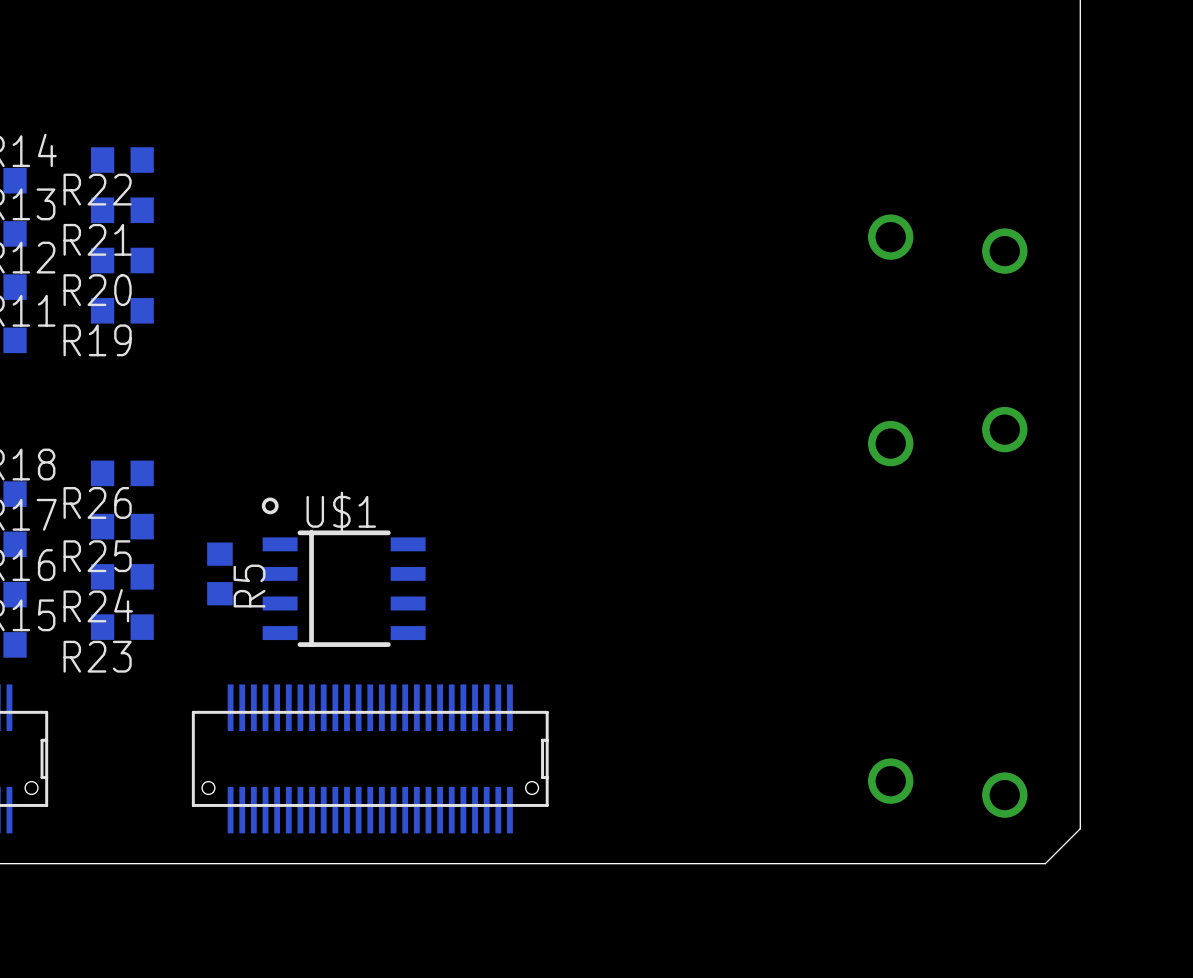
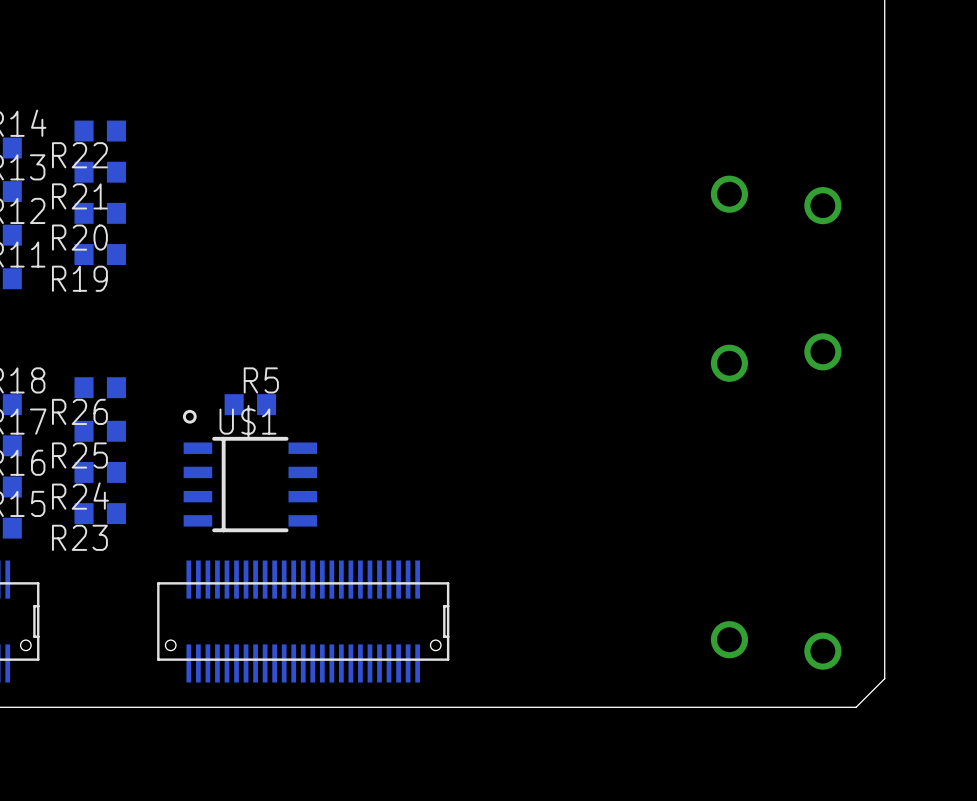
U$1 position: (343, 572) -> (250, 471)
R5 rotation: 0° (219, 573) -> 90° clockwise (250, 404)
R5 position: (219, 573) -> (250, 404)
R5 name position: R5 (249, 586) -> R5 (261, 380)

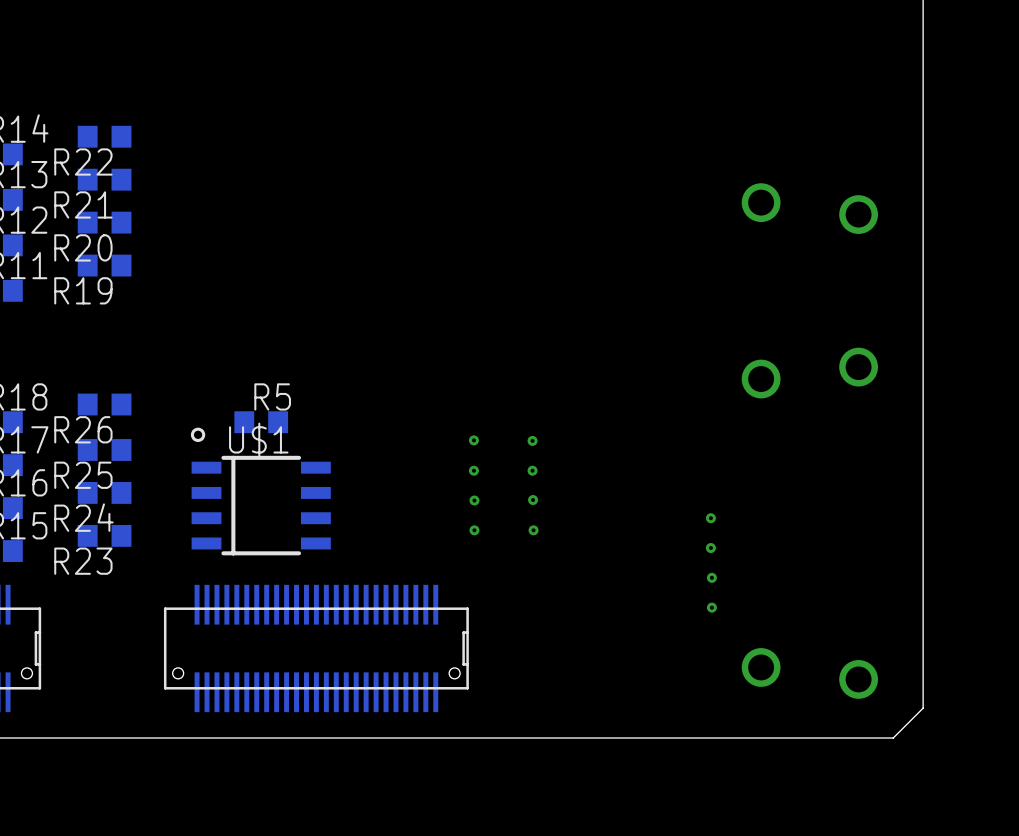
via: none -> (473, 440)
via: none -> (532, 440)
via: none -> (473, 470)
via: none -> (532, 470)
via: none -> (474, 500)
via: none -> (533, 500)
via: none -> (710, 518)
via: none -> (474, 530)
via: none -> (533, 530)
via: none -> (710, 548)
via: none -> (711, 577)
via: none -> (711, 607)

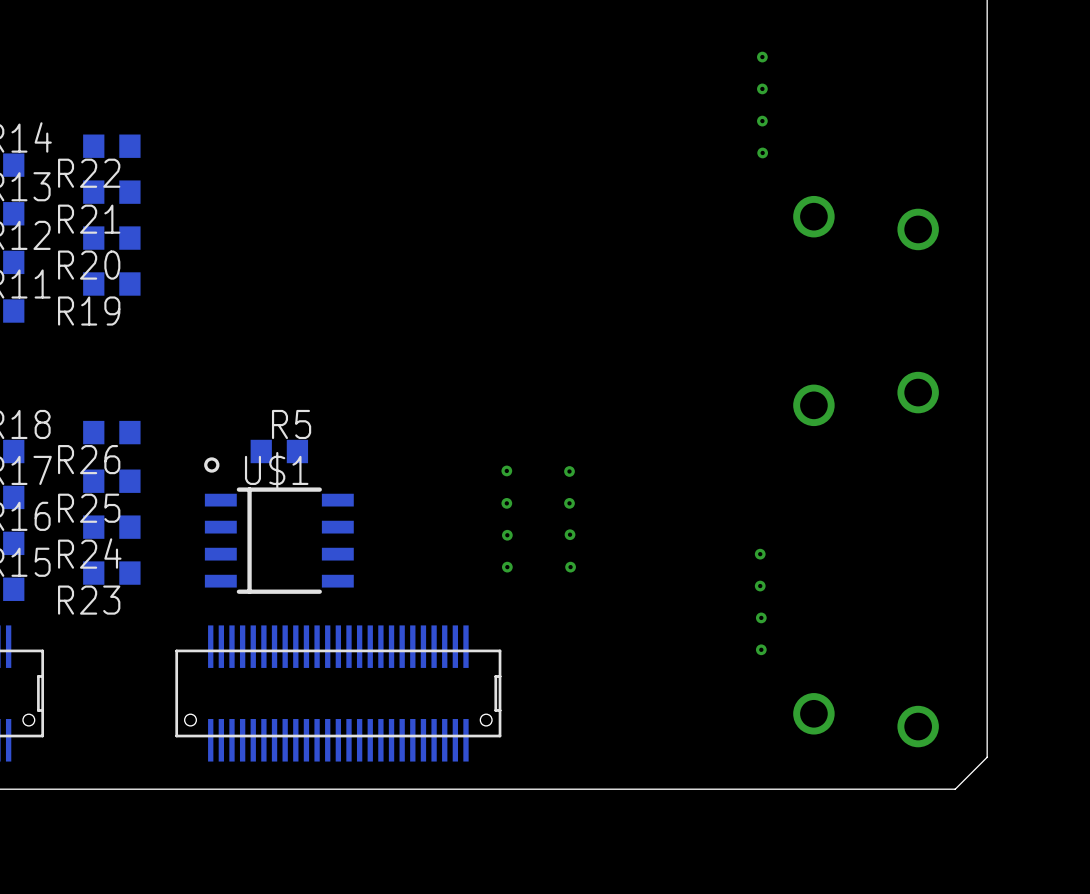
via: none -> (762, 57)
via: none -> (762, 88)
via: none -> (762, 121)
via: none -> (762, 152)

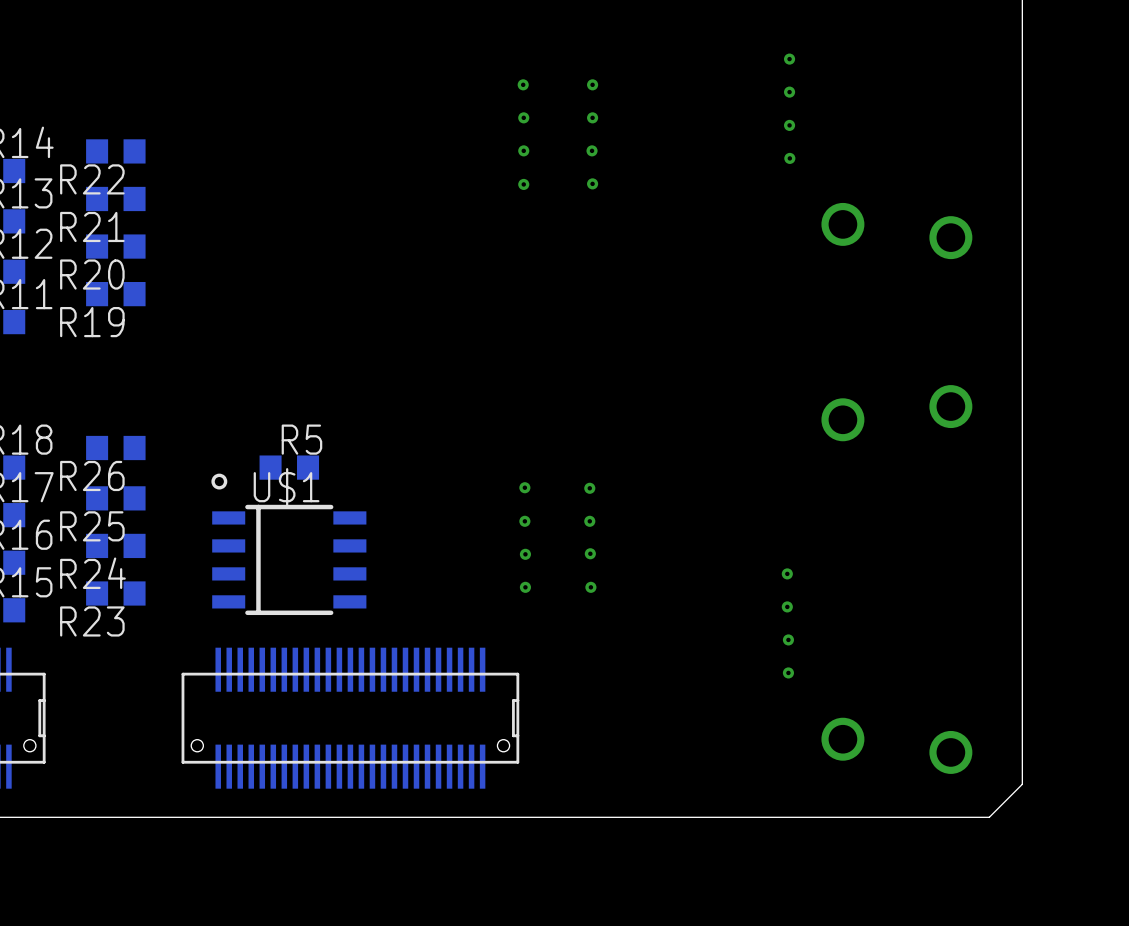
via: none -> (523, 84)
via: none -> (592, 84)
via: none -> (523, 117)
via: none -> (592, 117)
via: none -> (523, 150)
via: none -> (592, 150)
via: none -> (592, 183)
via: none -> (523, 184)

